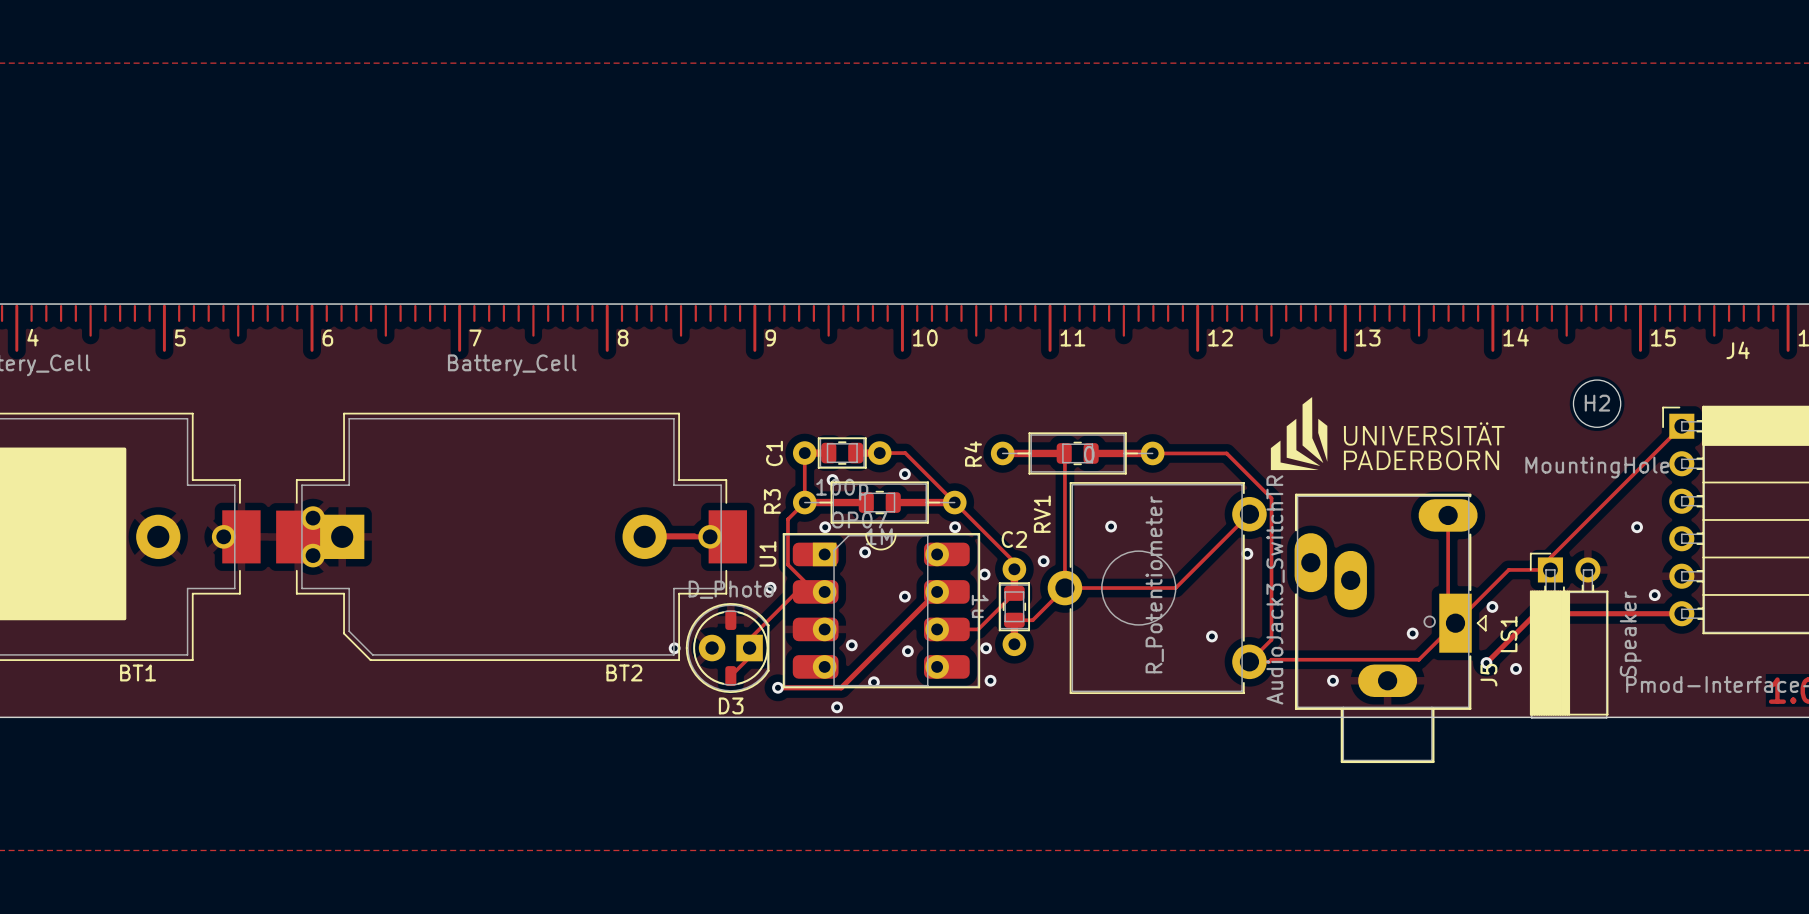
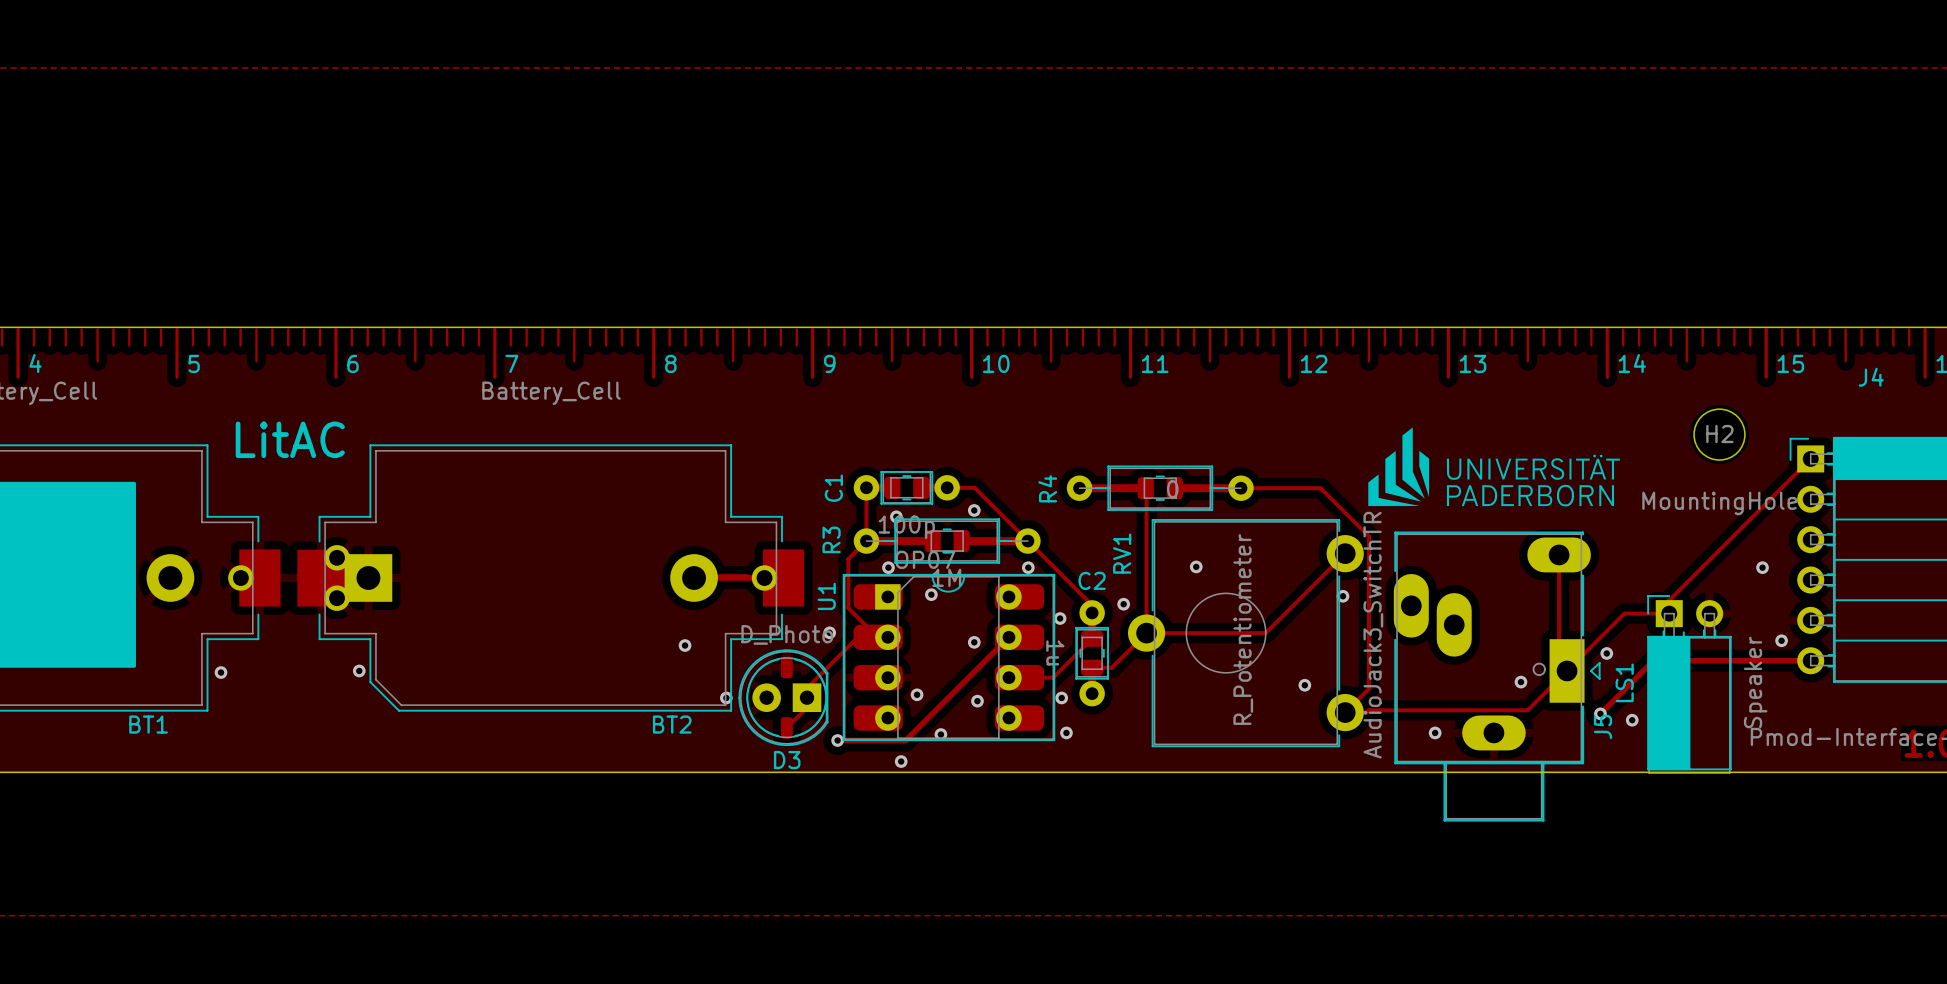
text: none -> LitAC (290, 439)
via: none -> (685, 645)
via: none -> (359, 670)
via: none -> (221, 672)

